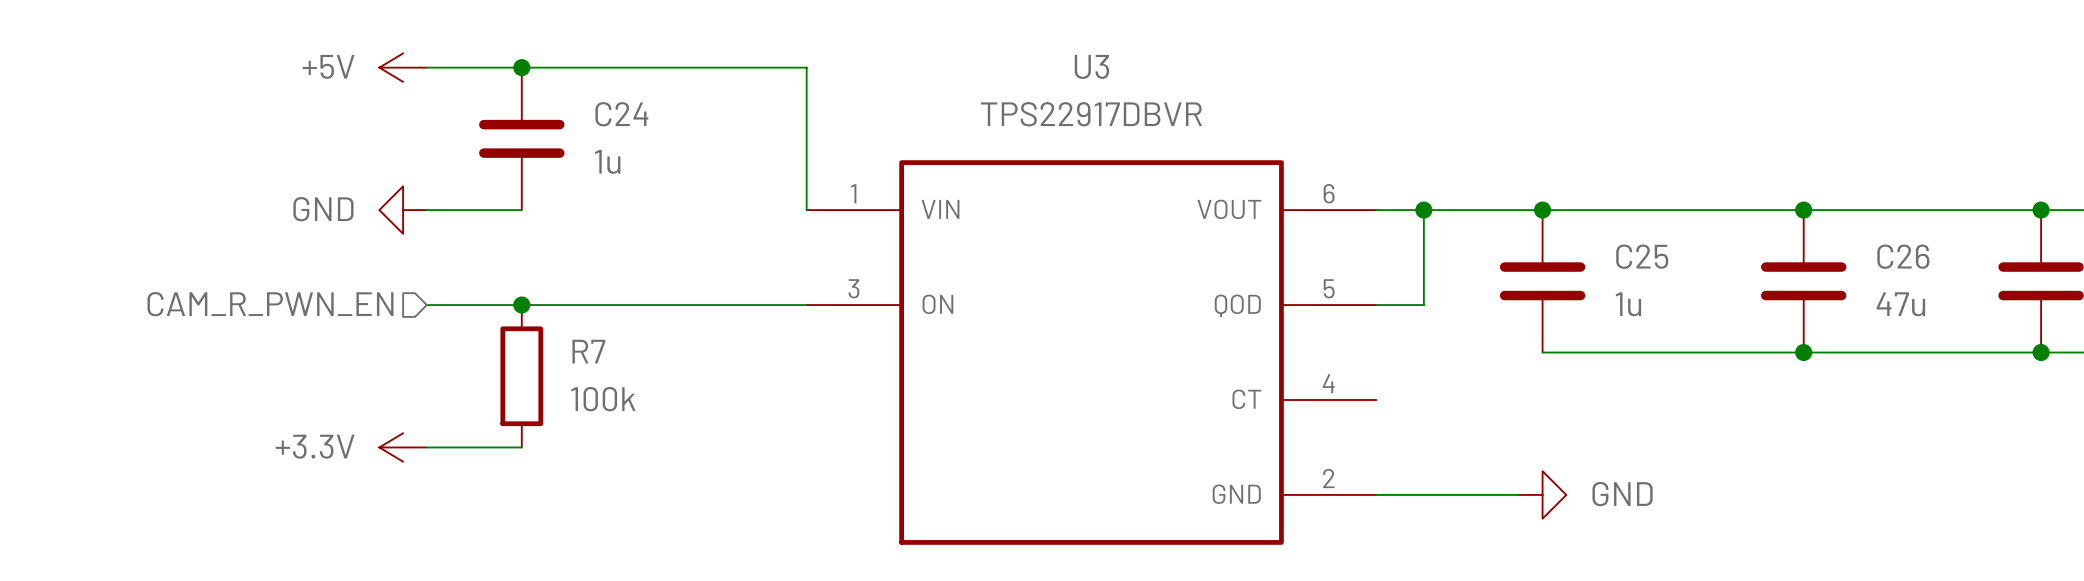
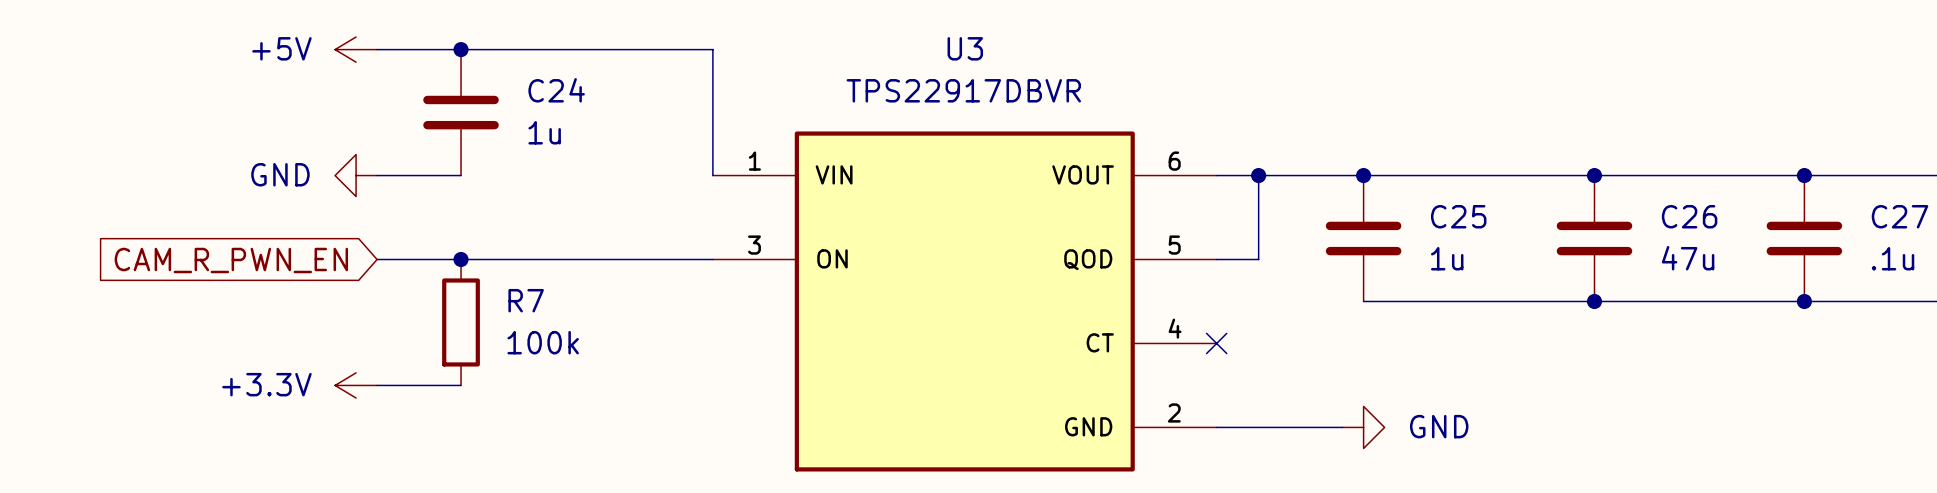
hierarchical label: CAM_R_PWN_EN (270, 304) -> none
global label: none -> CAM_R_PWN_EN (231, 260)
no-connect mark: none -> (1216, 343)

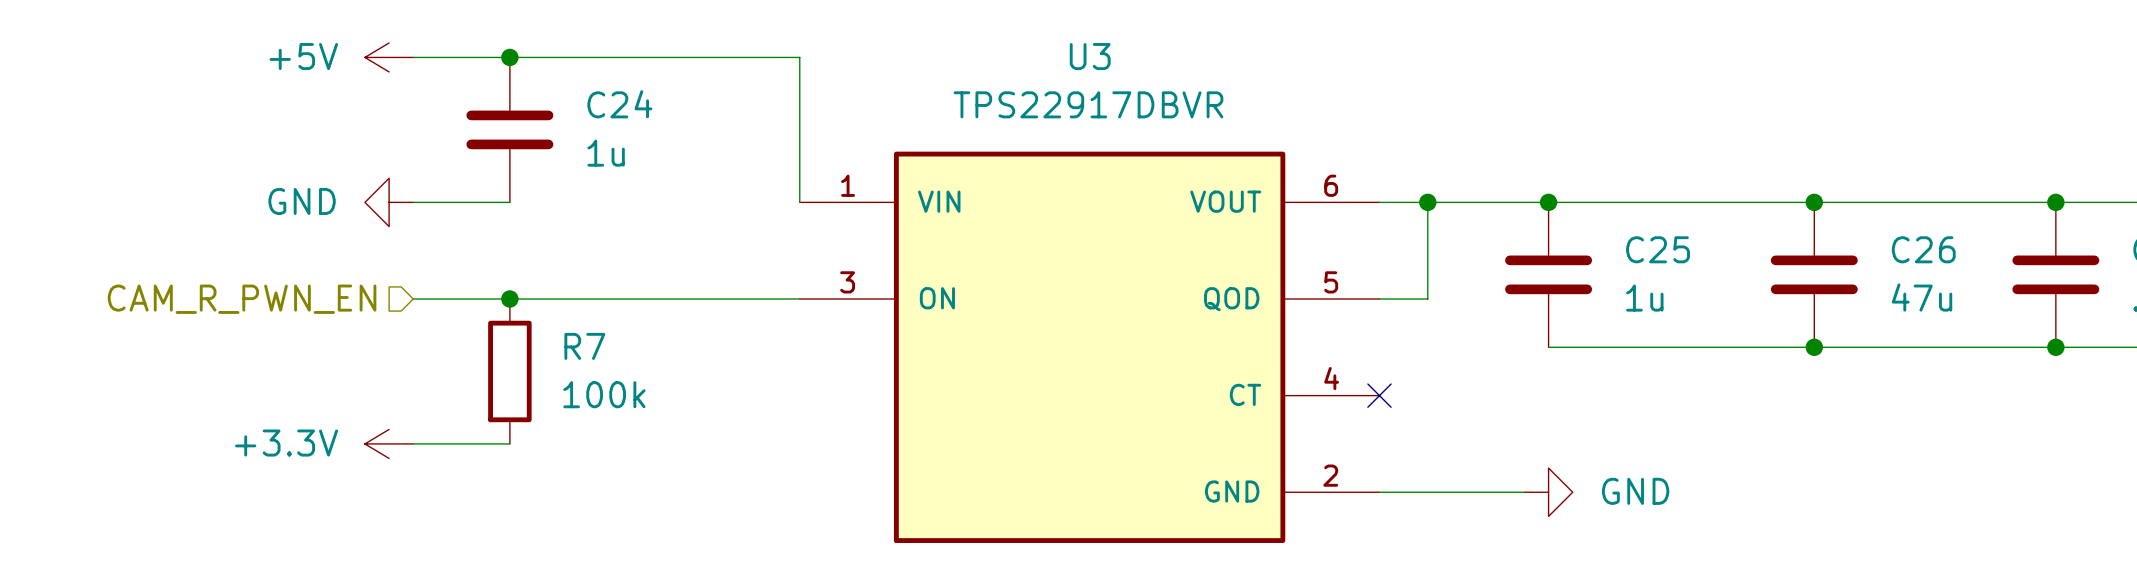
hierarchical label: none -> CAM_R_PWN_EN (242, 299)
global label: CAM_R_PWN_EN (231, 260) -> none

